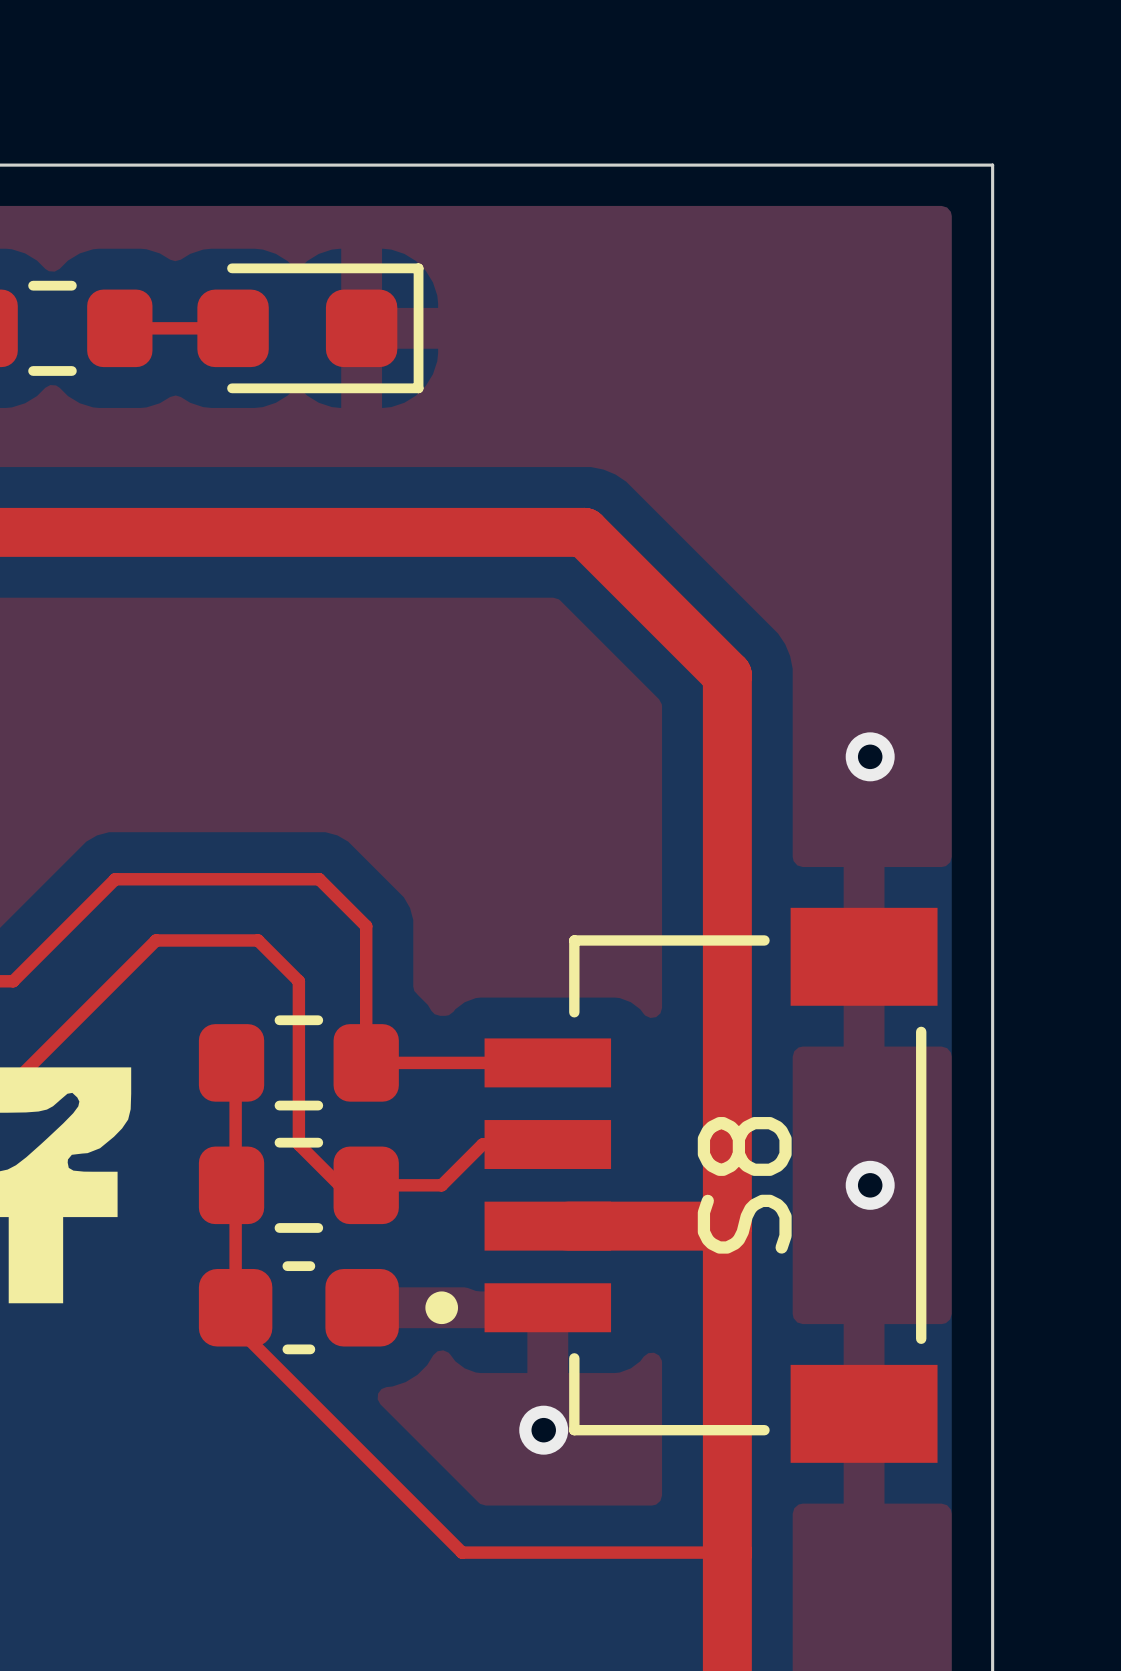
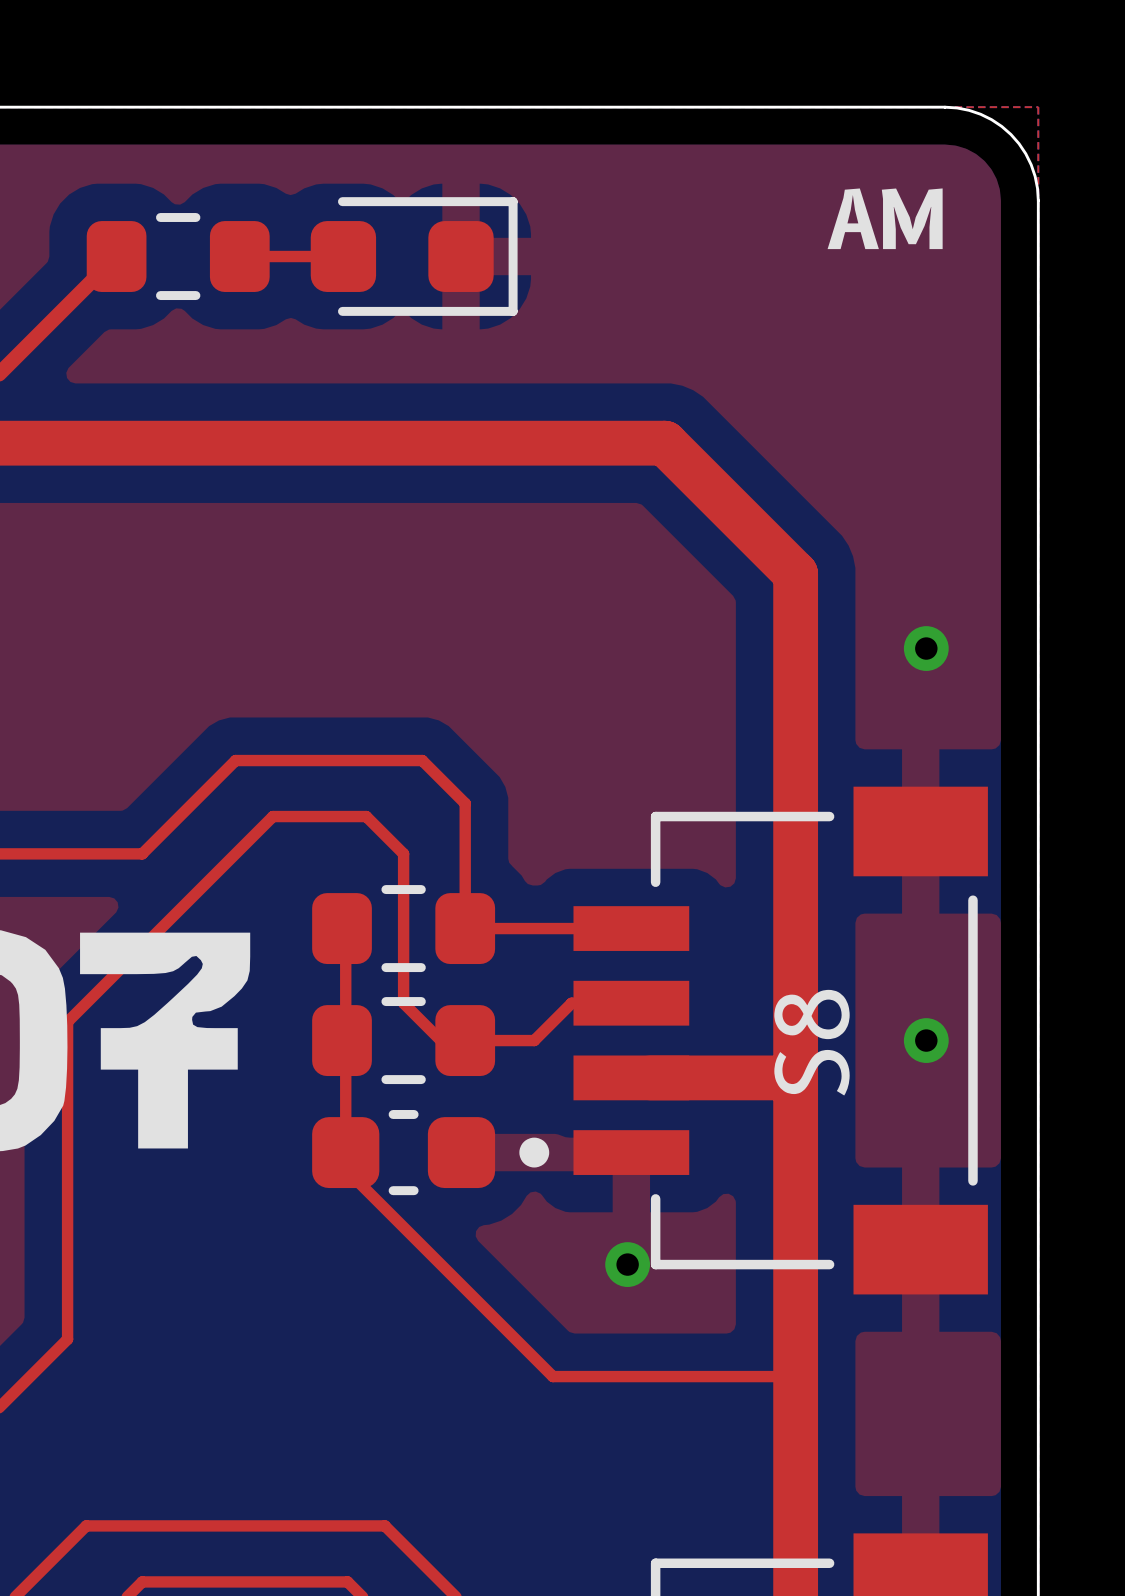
board edge: (890, 165) (992, 165) (992, 267) -> (944, 107) (957, 107) (980, 114) (991, 119) (1010, 134) (1019, 143) (1031, 164) (1037, 188) (1038, 200)
text: none -> AM (885, 218)

